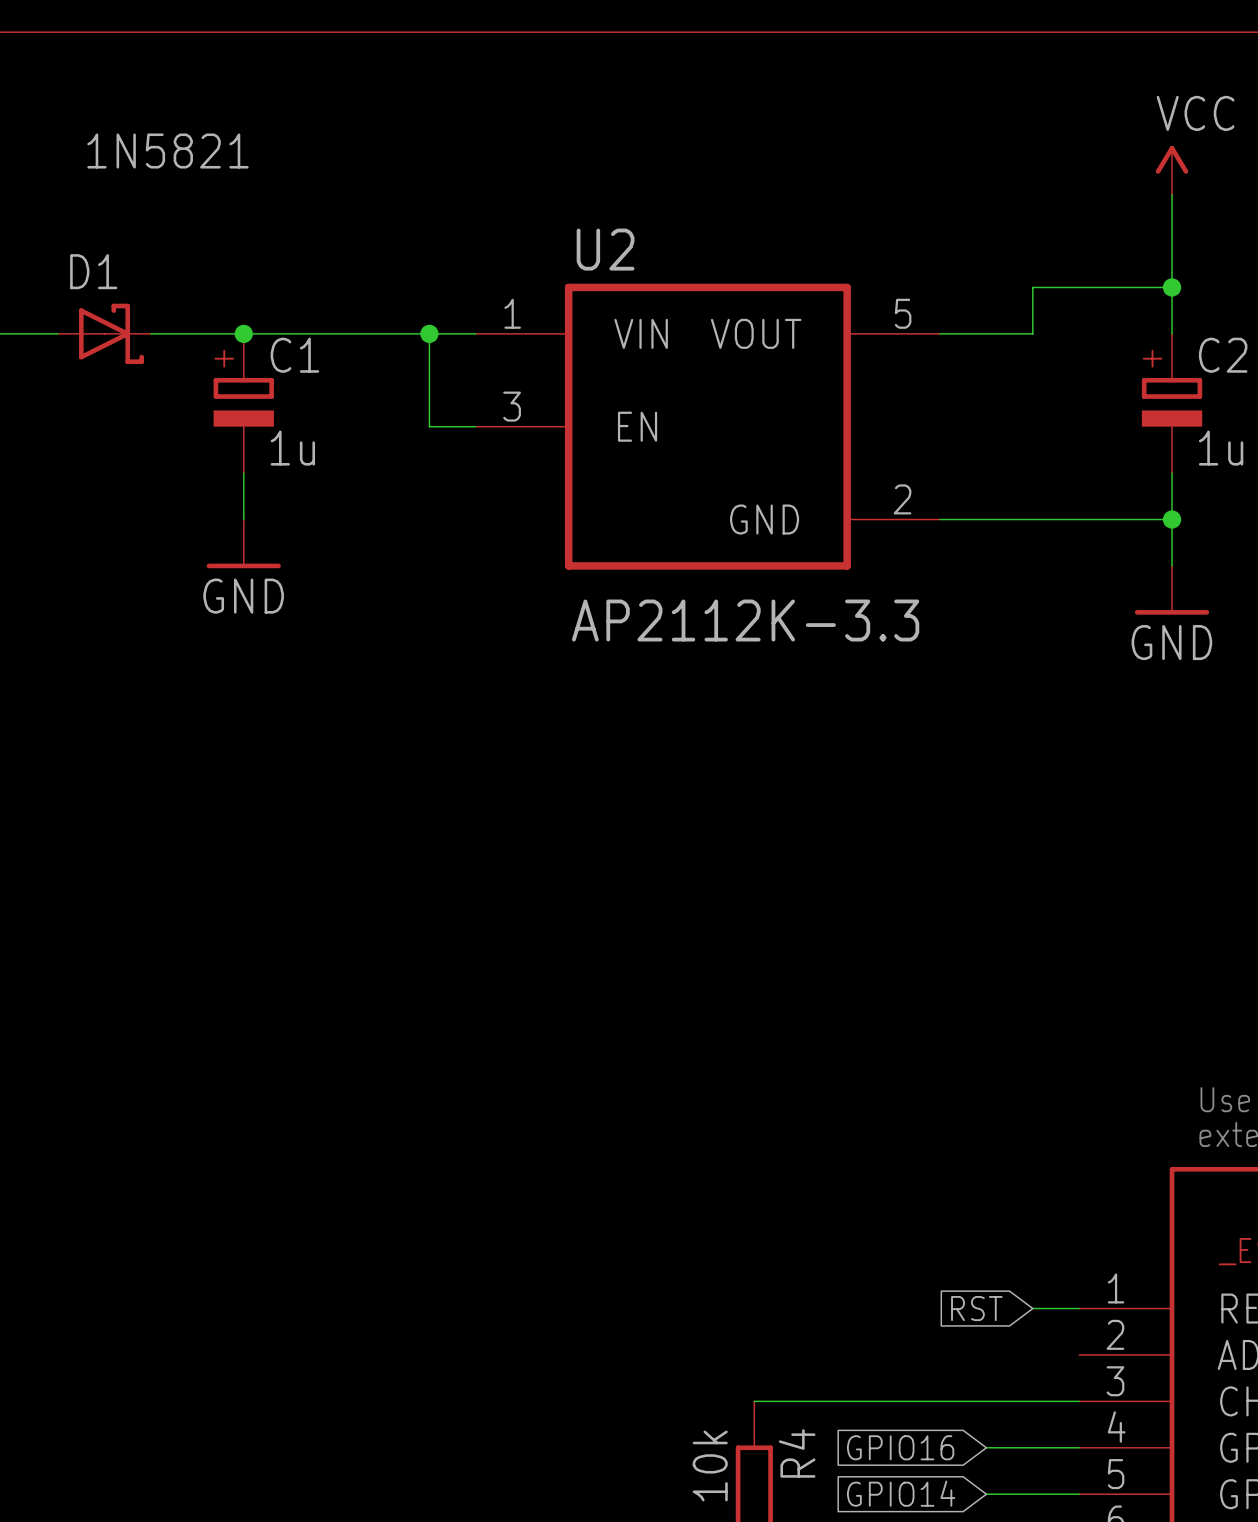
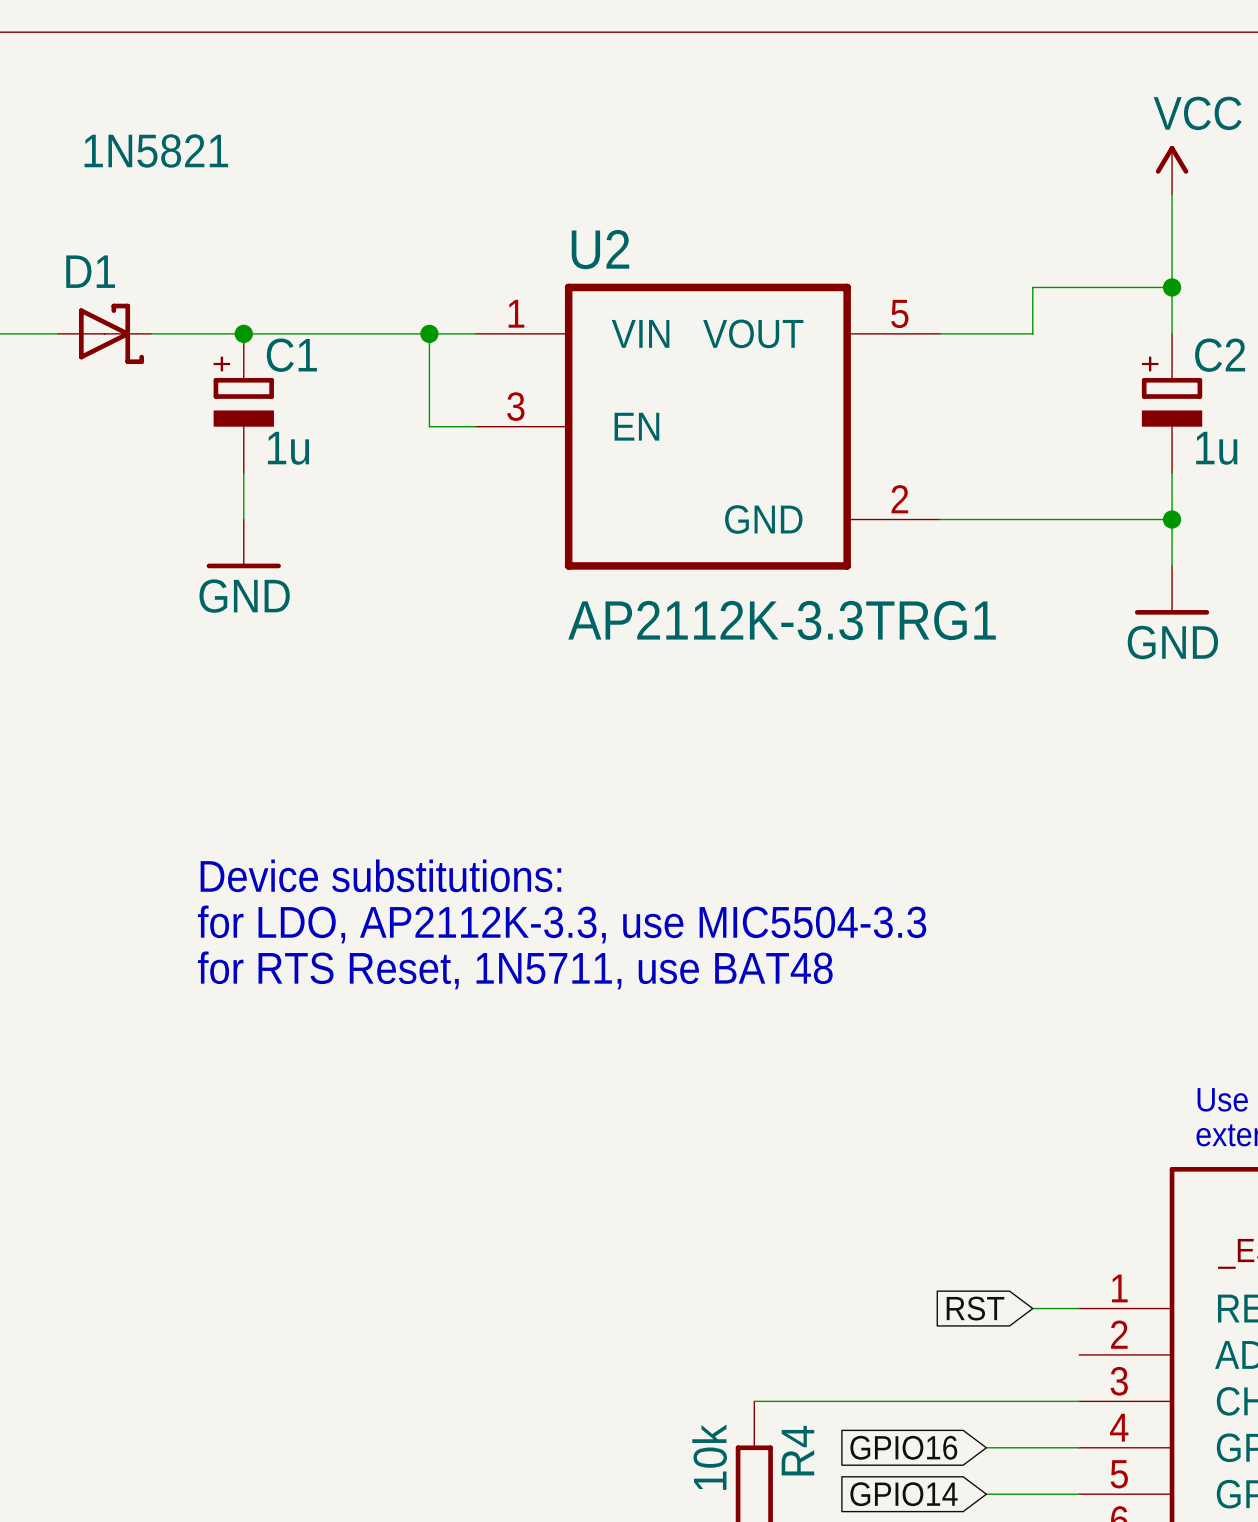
U2 value: AP2112K-3.3 (745, 620) -> AP2112K-3.3TRG1 (782, 620)
text: none -> Device substitutions: (380, 875)
text: none -> for LDO, AP2112K-3.3, use MIC5504-3.3 (562, 924)
text: none -> for RTS Reset, 1N5711, use BAT48 (515, 970)

